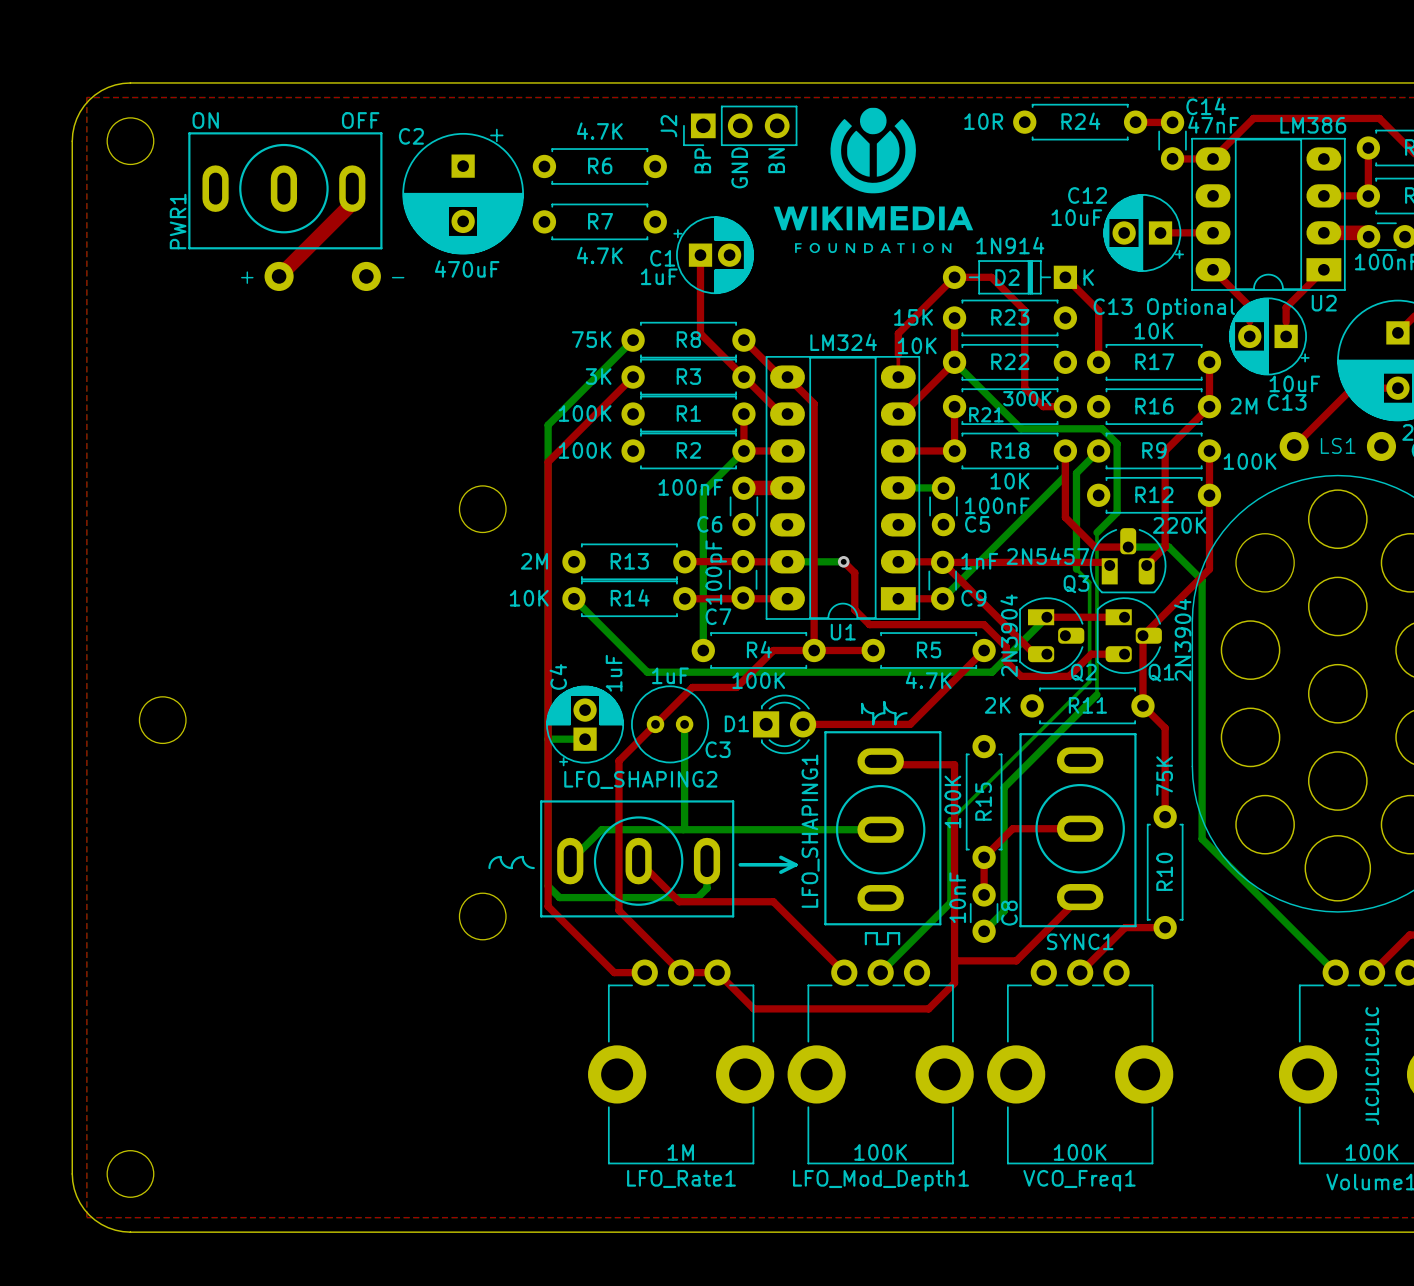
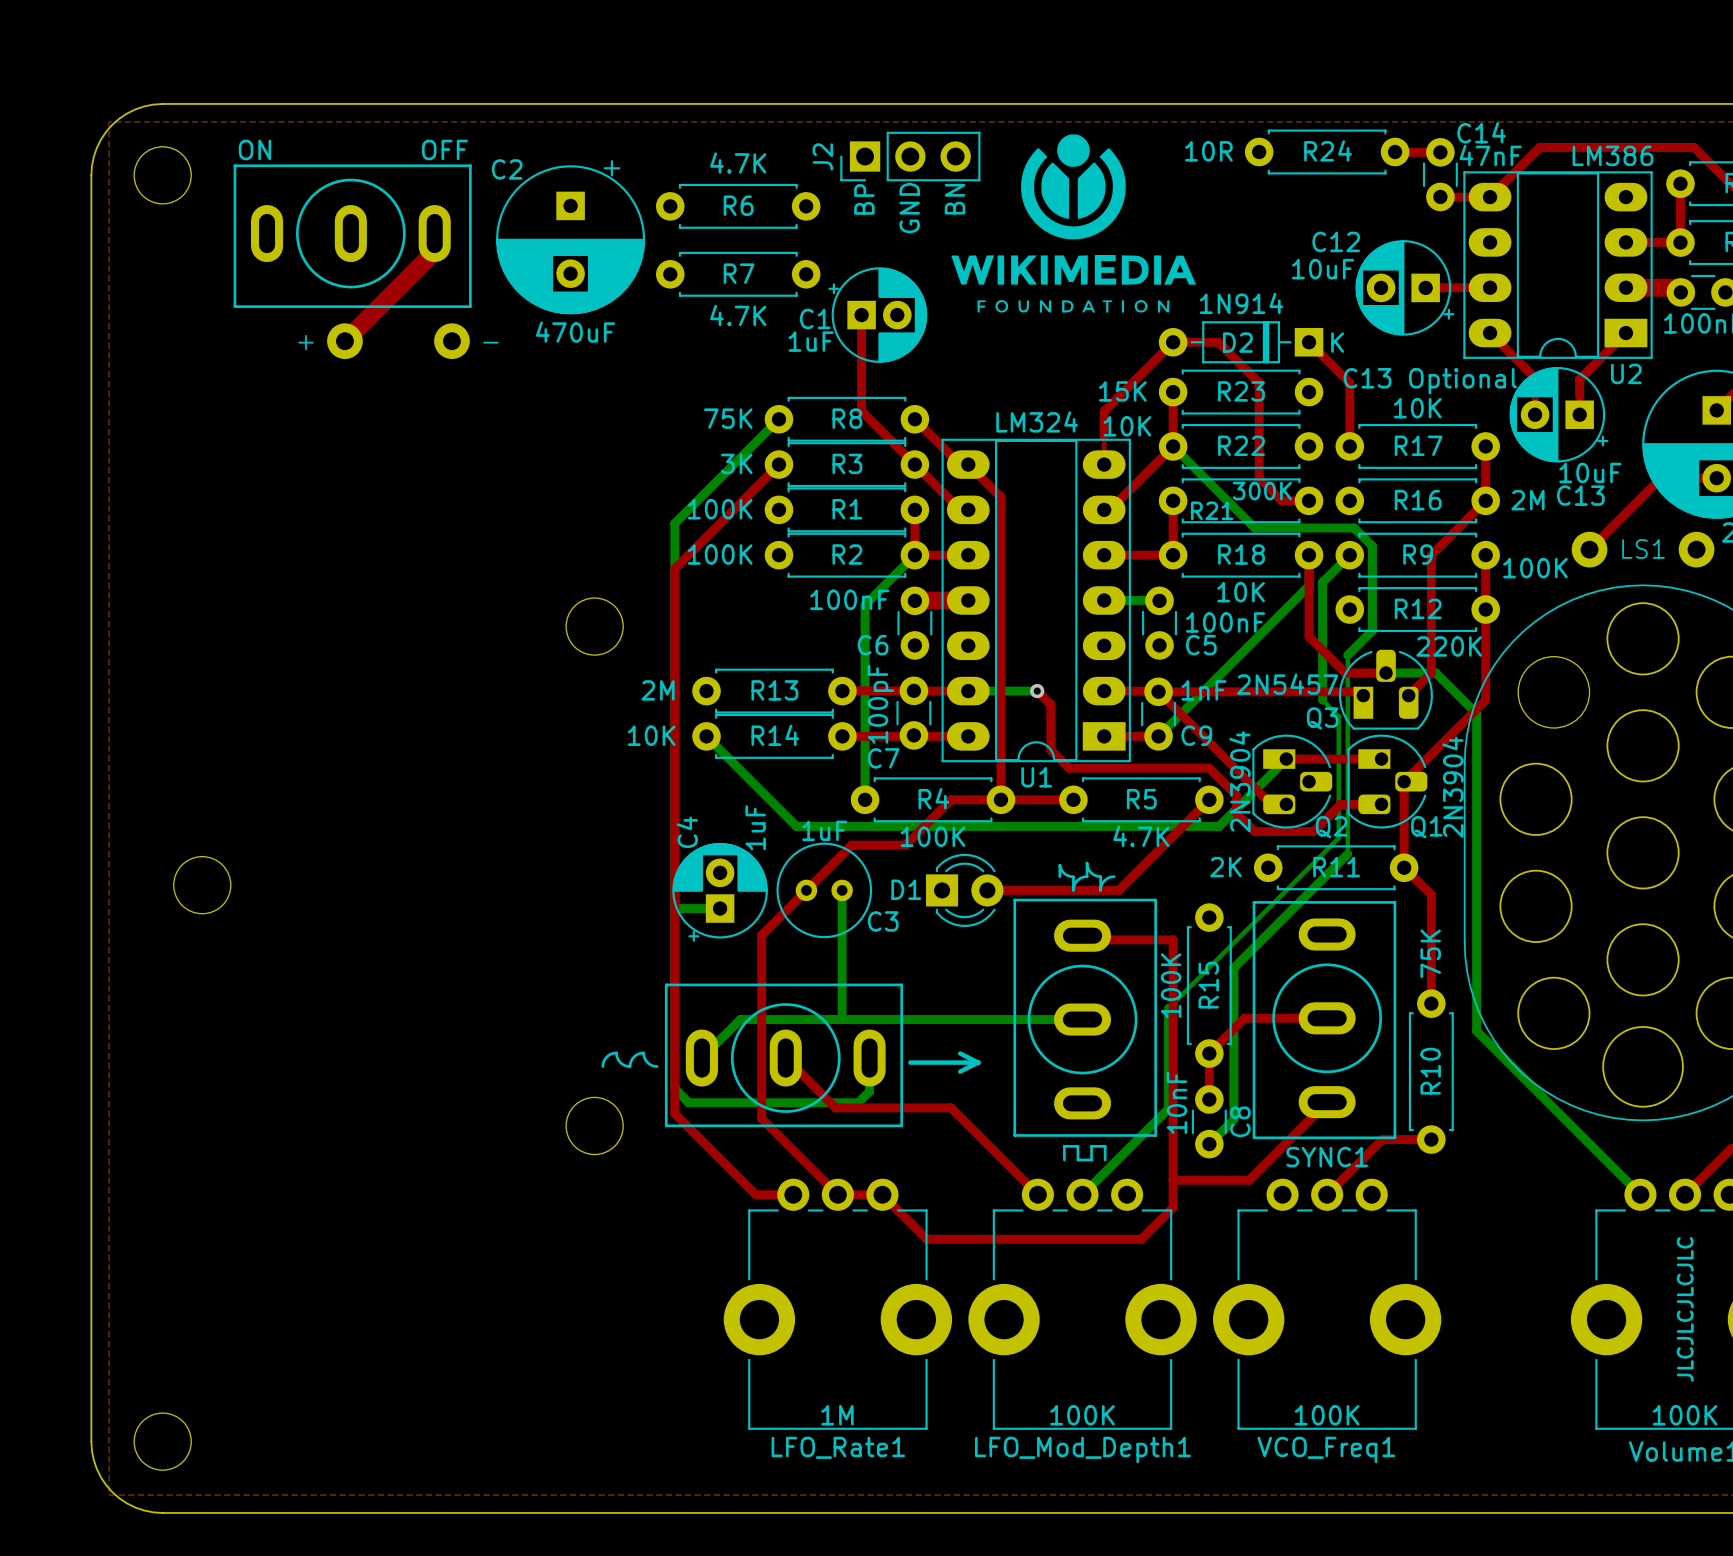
PWR1 name: PWR1 (178, 221) -> none
LFO_SHAPING2 name: LFO_SHAPING2 (640, 779) -> none
LFO_SHAPING1 name: LFO_SHAPING1 (810, 831) -> none

